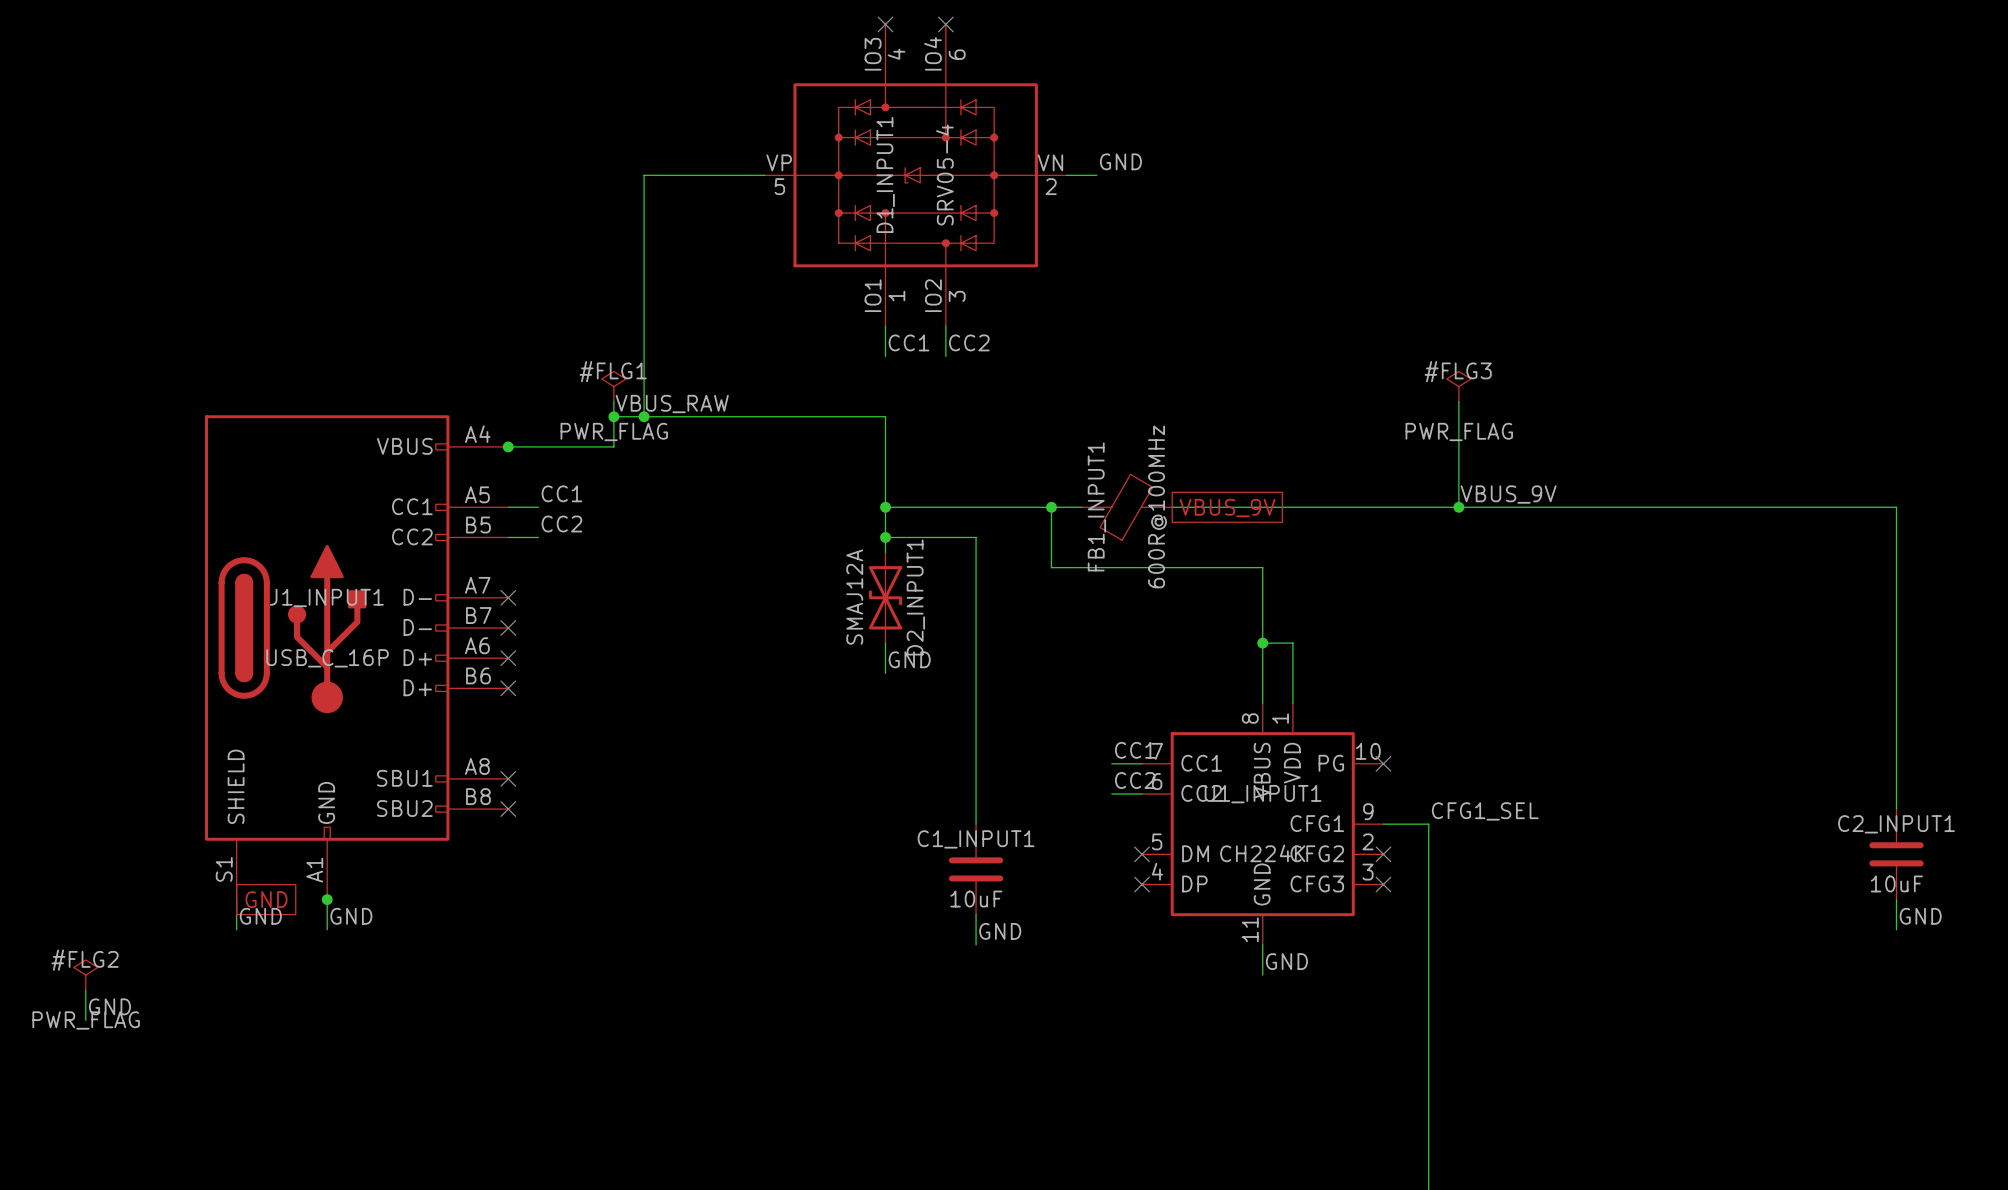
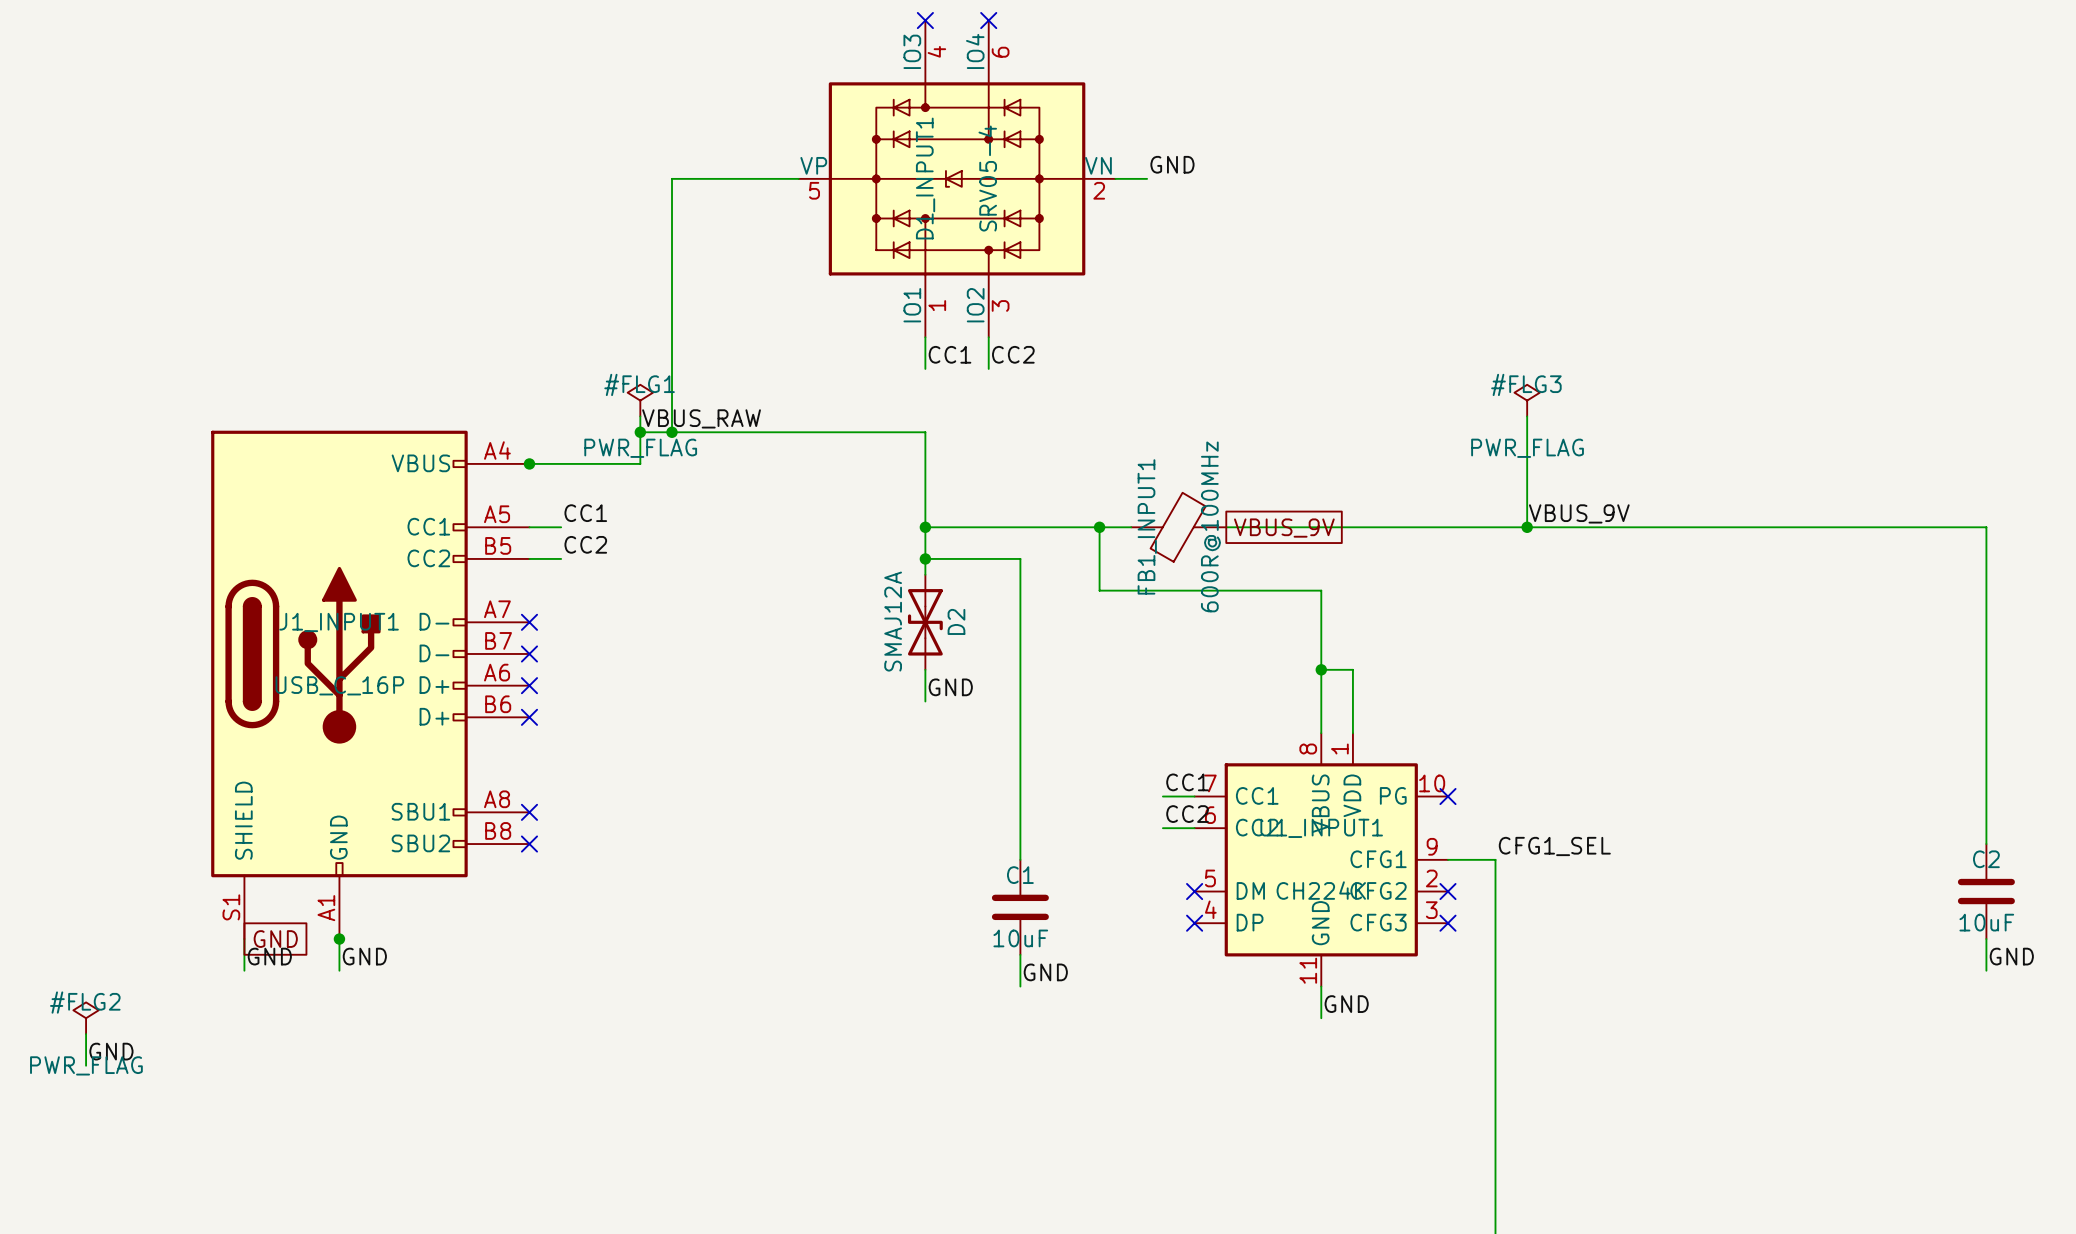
D2_INPUT1 name: D2_INPUT1 (915, 597) -> D2 (956, 621)
C2_INPUT1 name: C2_INPUT1 (1896, 824) -> C2 (1986, 859)
C1_INPUT1 name: C1_INPUT1 (976, 839) -> C1 (1020, 875)

